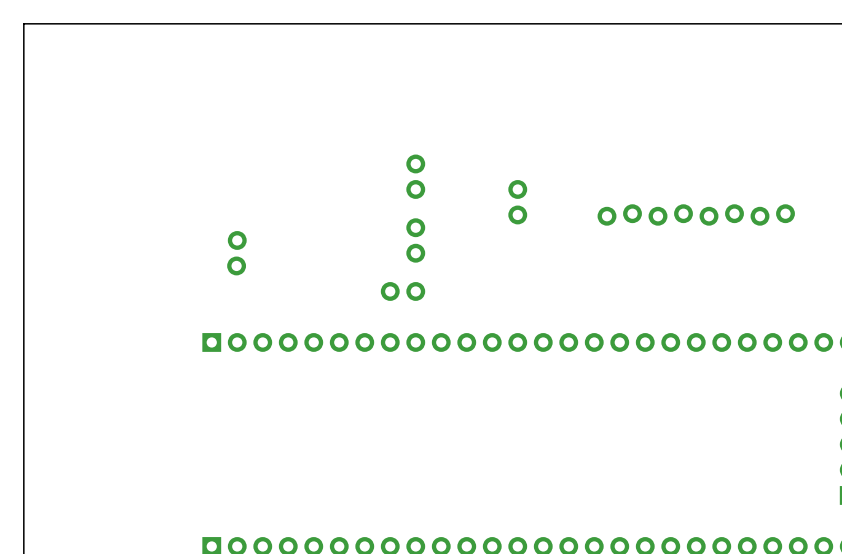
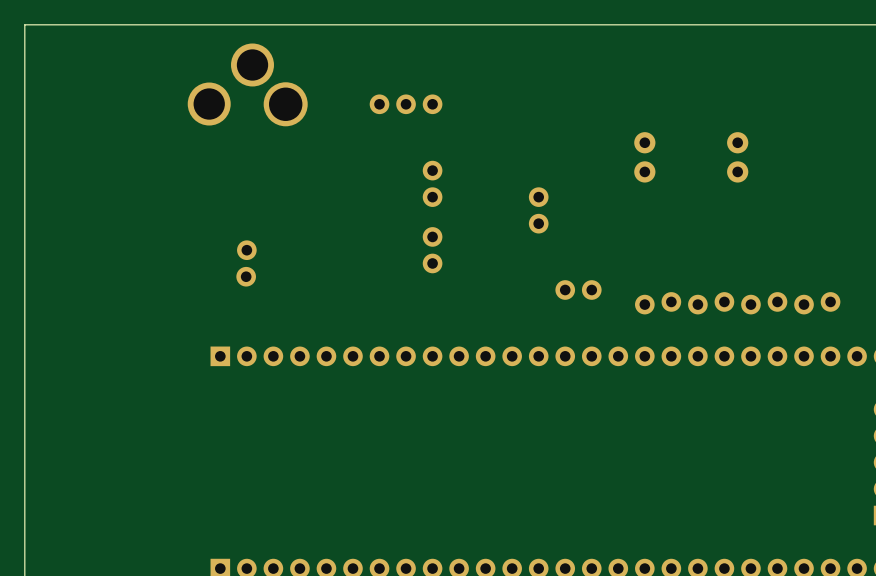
part: none -> (247, 84)
part: none -> (406, 104)
part: none -> (644, 157)
part: none -> (737, 157)
part position: (696, 214) -> (737, 303)
part position: (403, 291) -> (578, 290)

